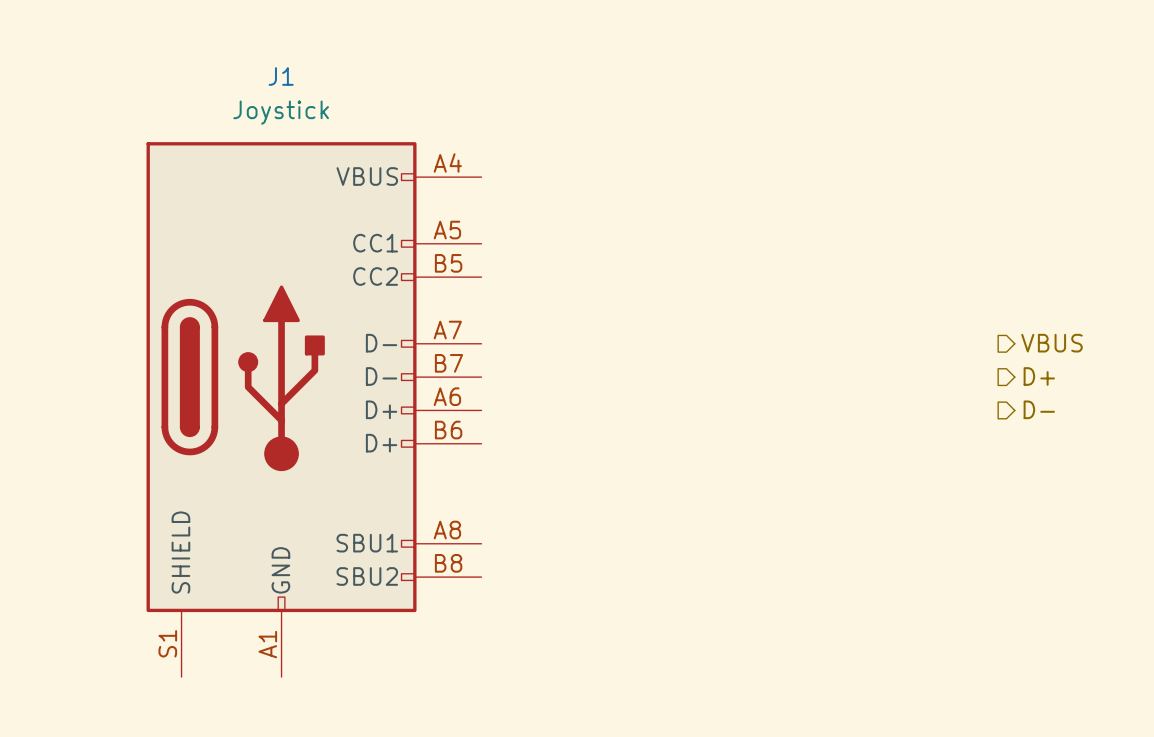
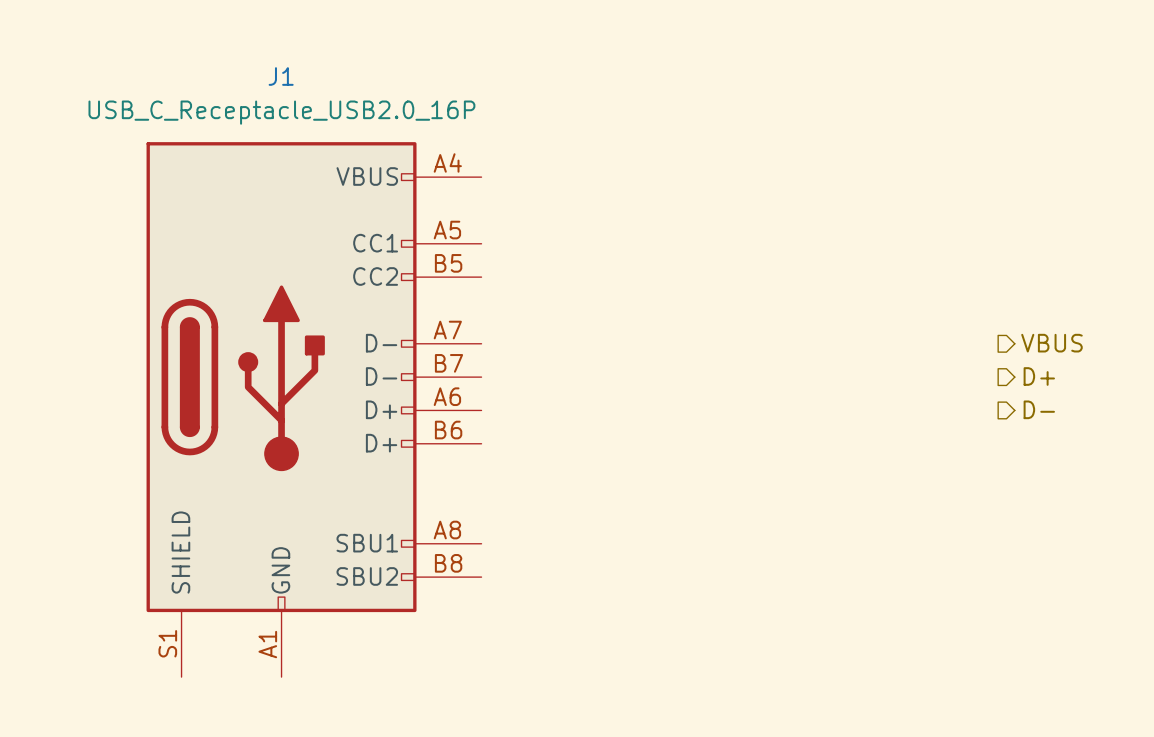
J1 value: Joystick (281, 112) -> USB_C_Receptacle_USB2.0_16P (281, 112)

